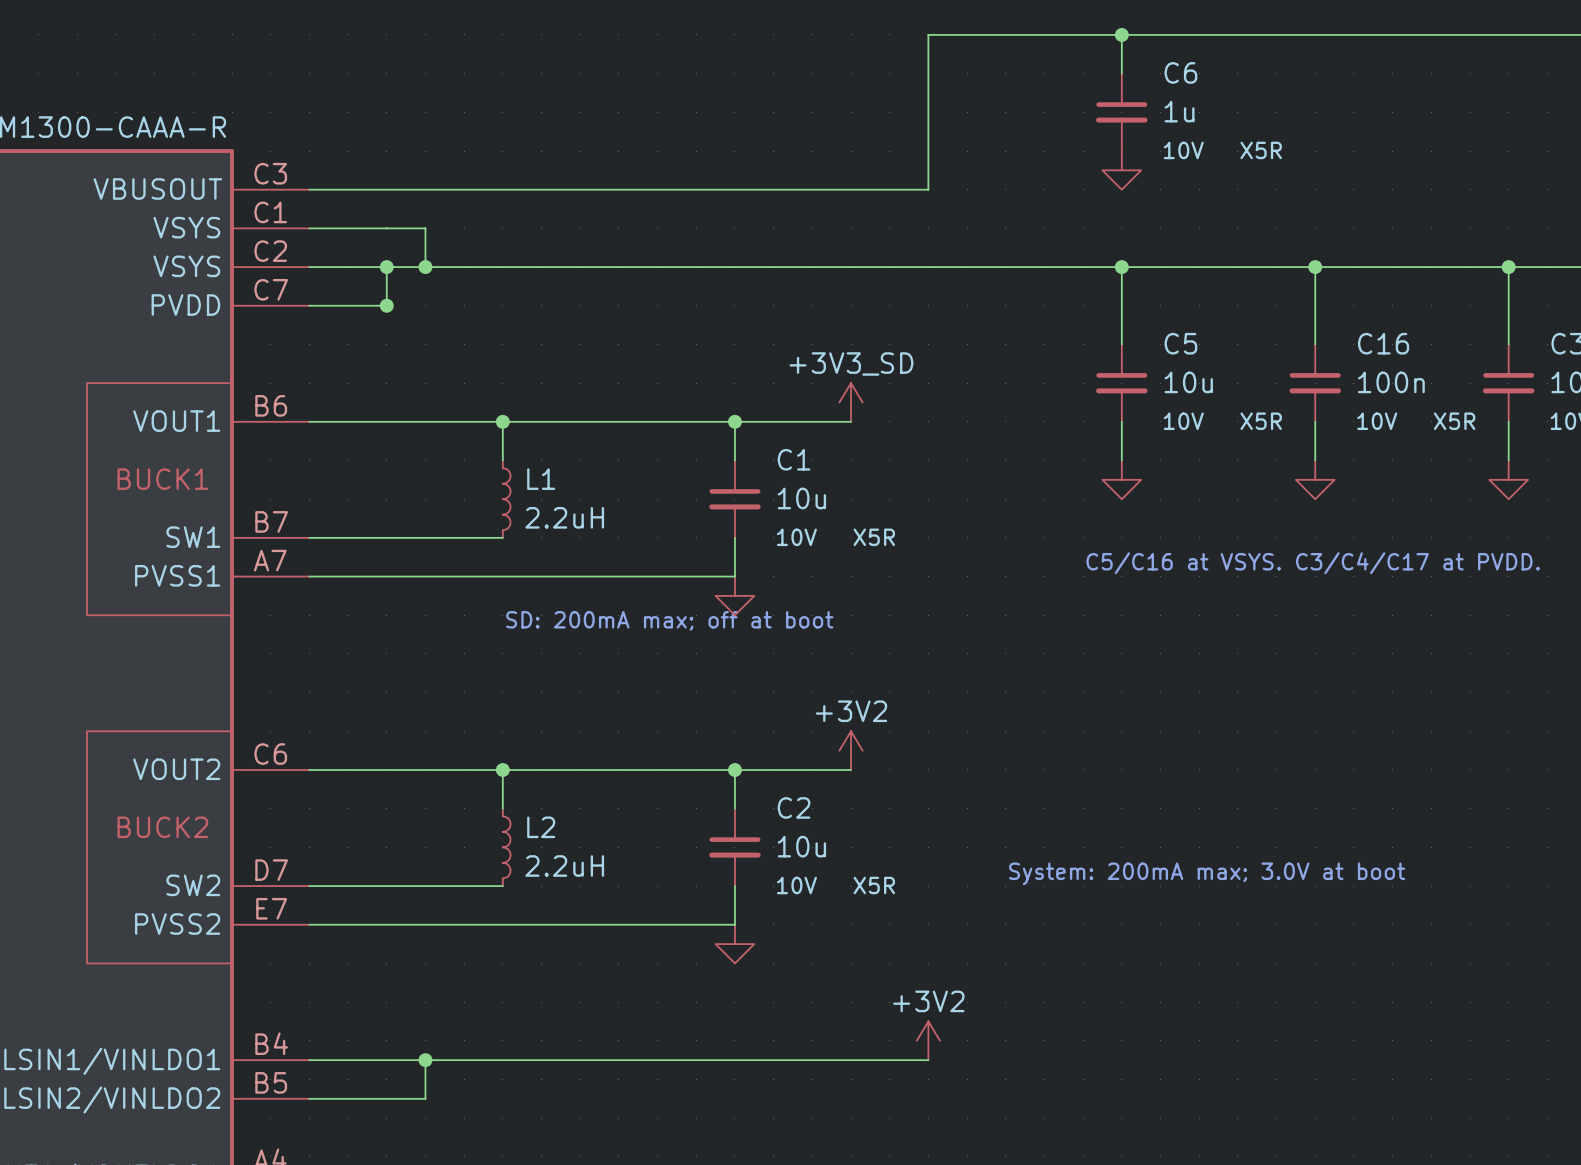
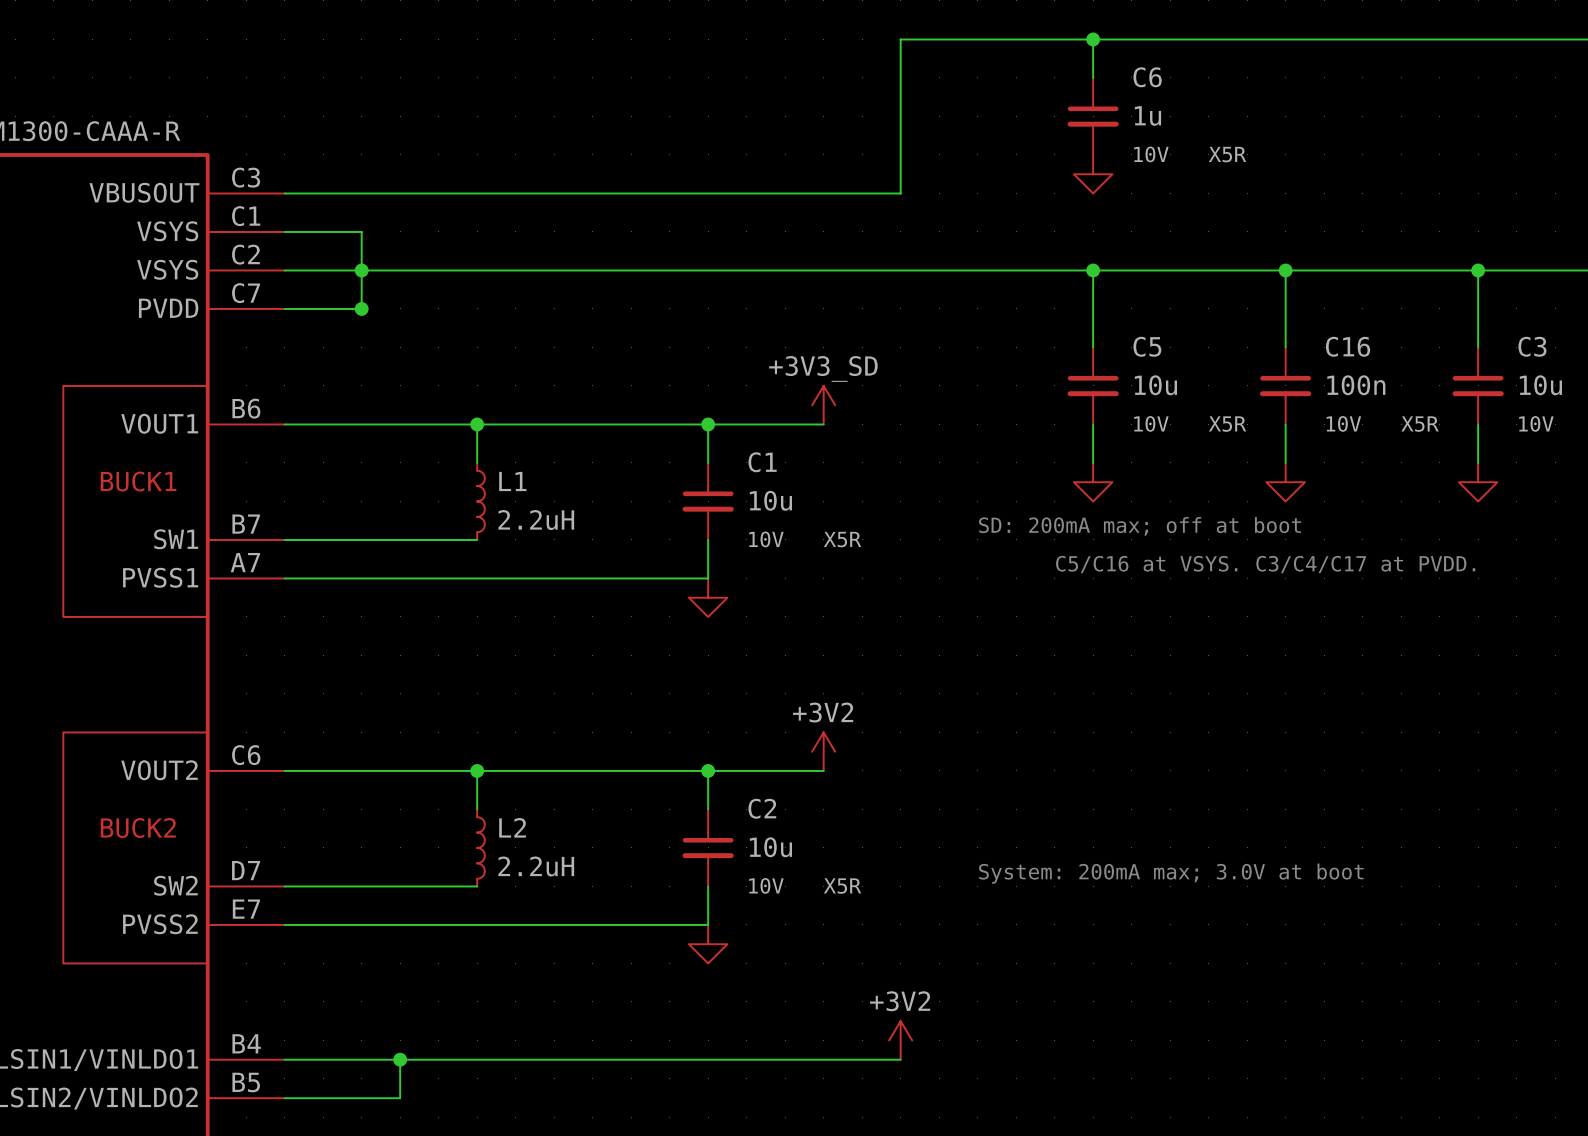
wire: (386, 228) (425, 228) (425, 267) -> (361, 231) (361, 270)
junction: (425, 267) -> none
text: none -> SD: 200mA max; off at boot (1140, 526)
text: SD: 200mA max; off at boot (669, 620) -> none

